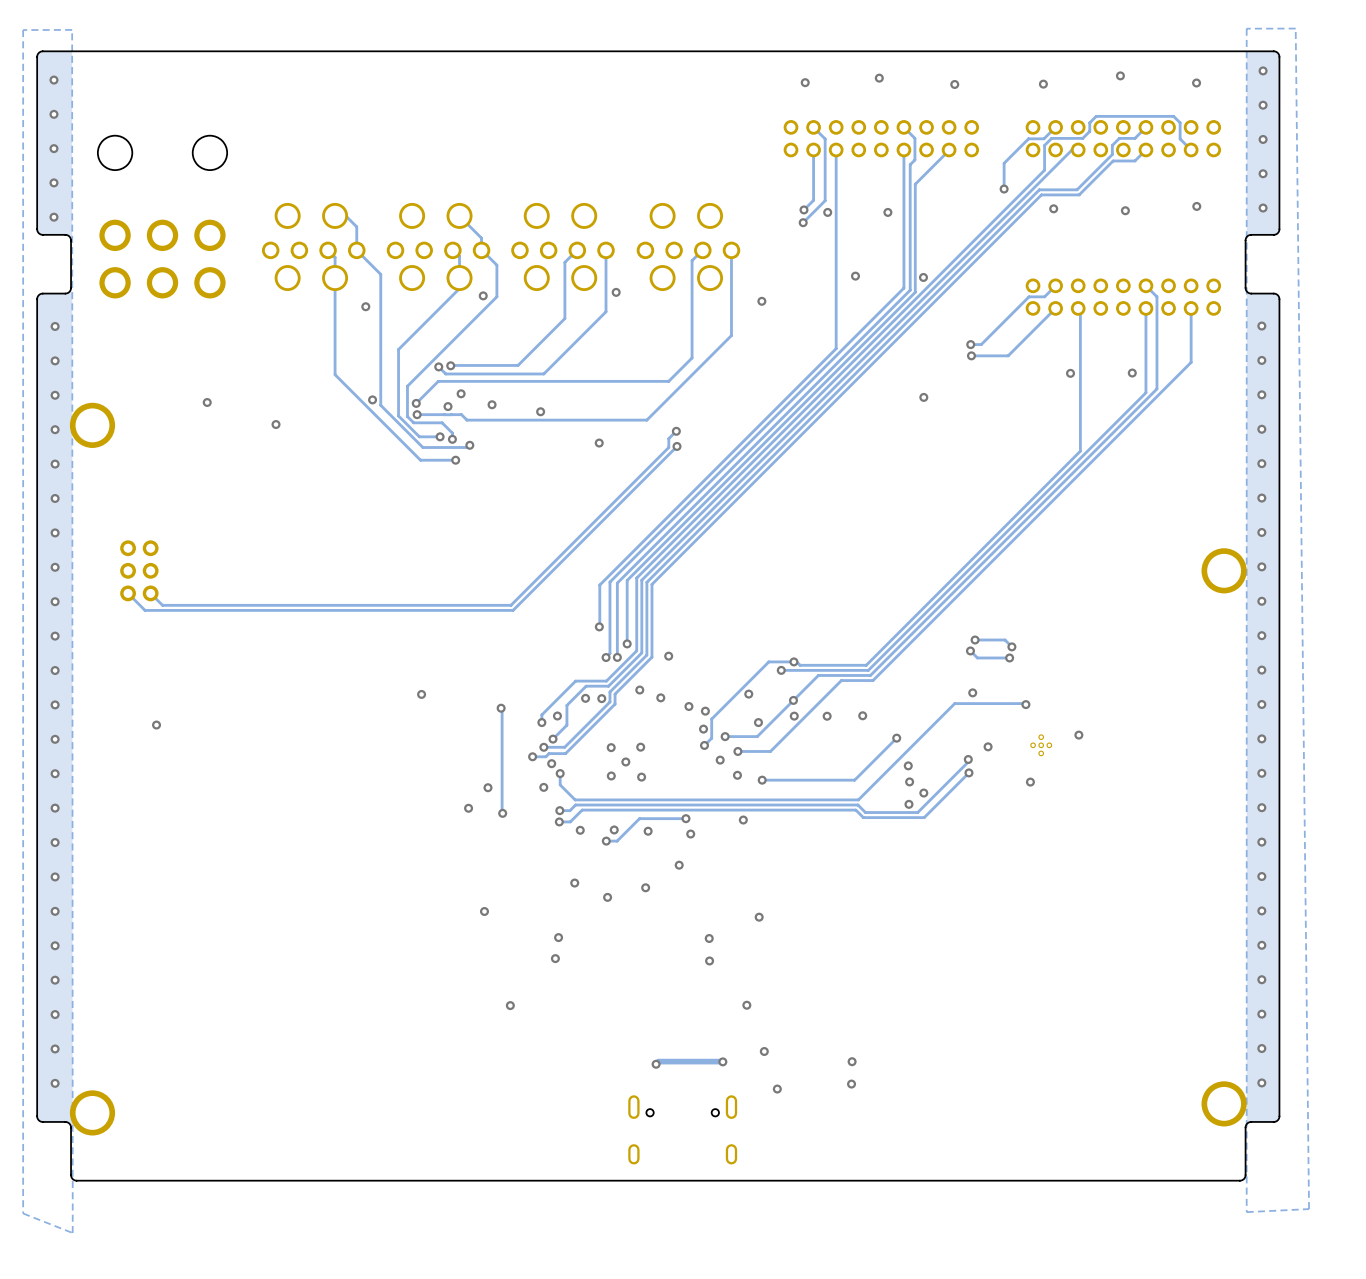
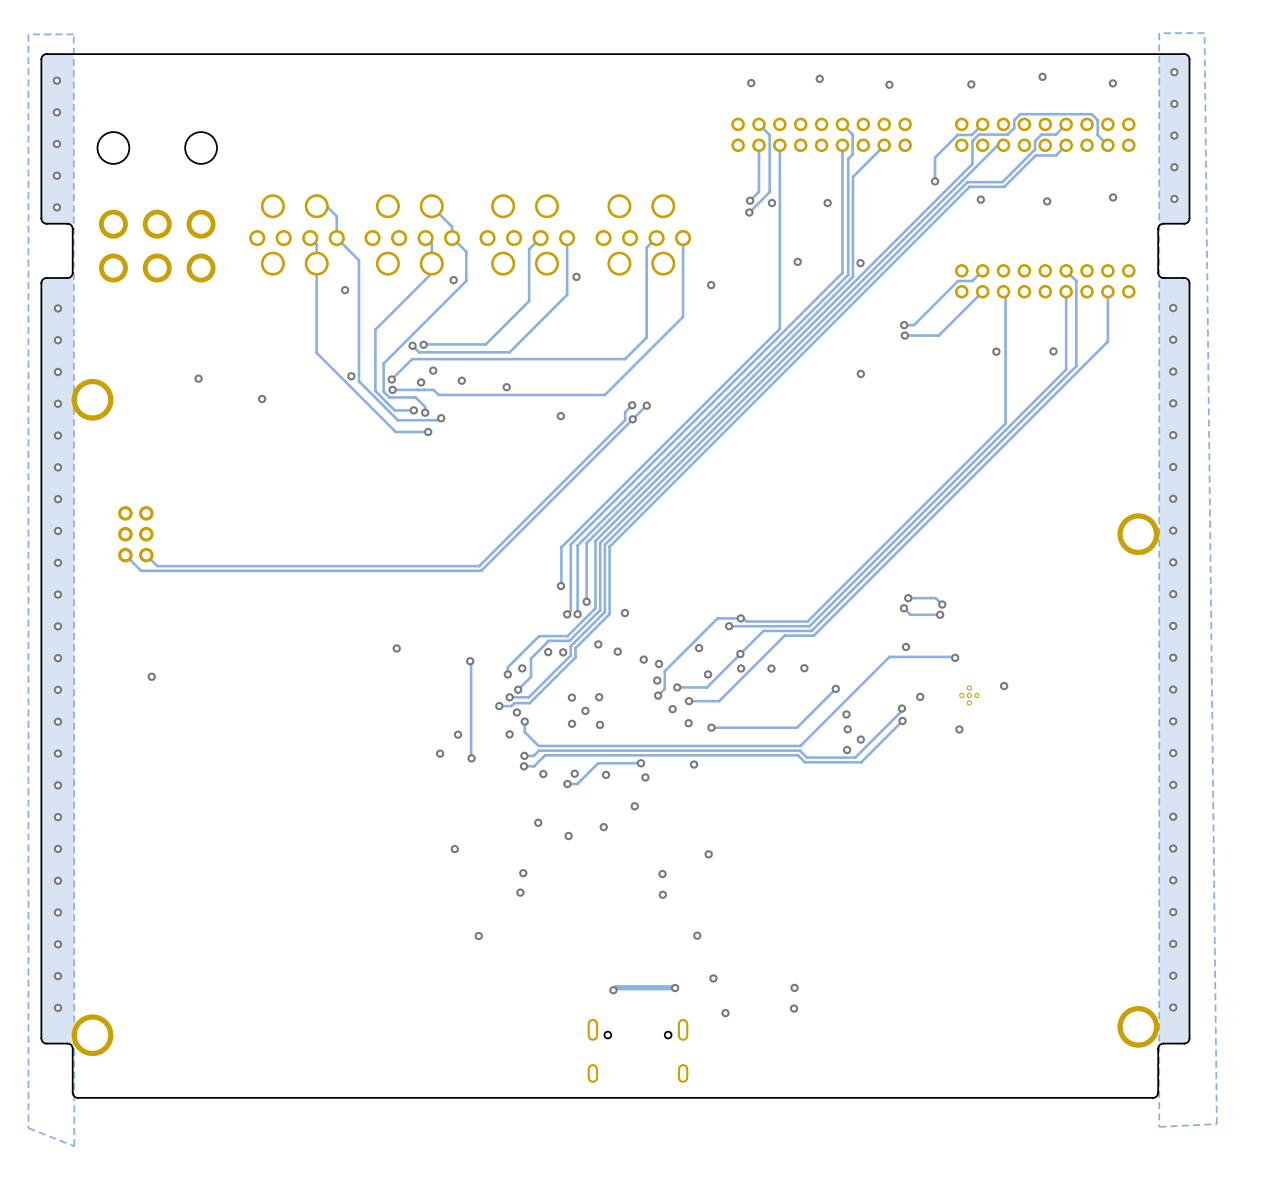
track: none -> (646, 405) (632, 419)
via: none -> (646, 405)

